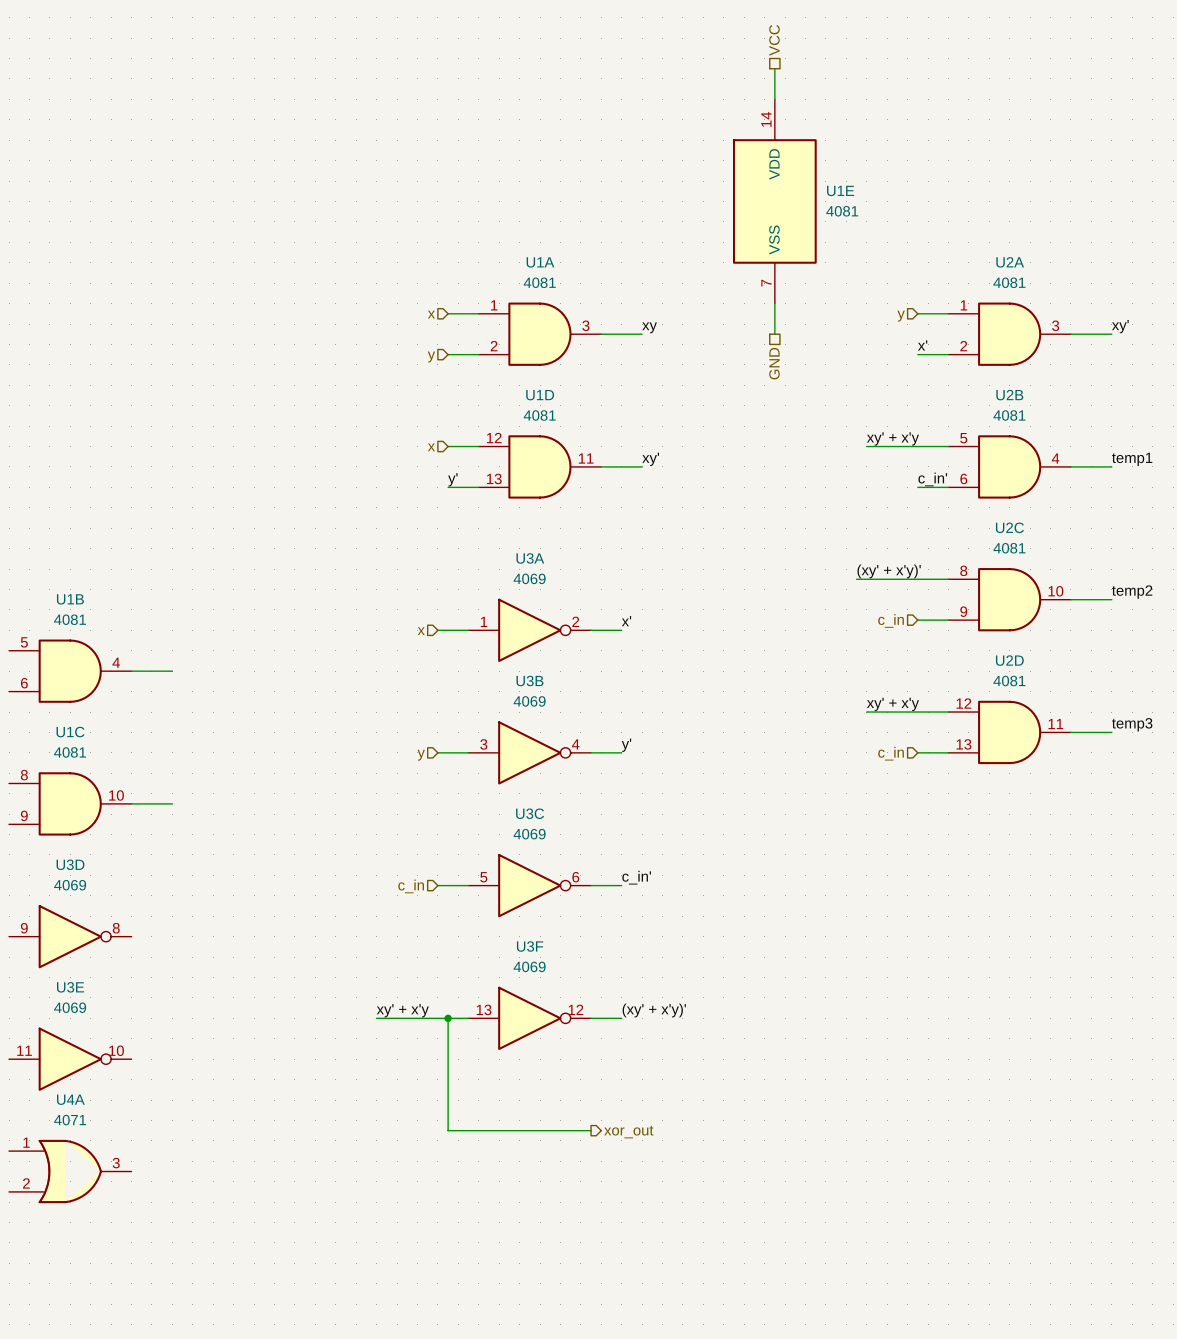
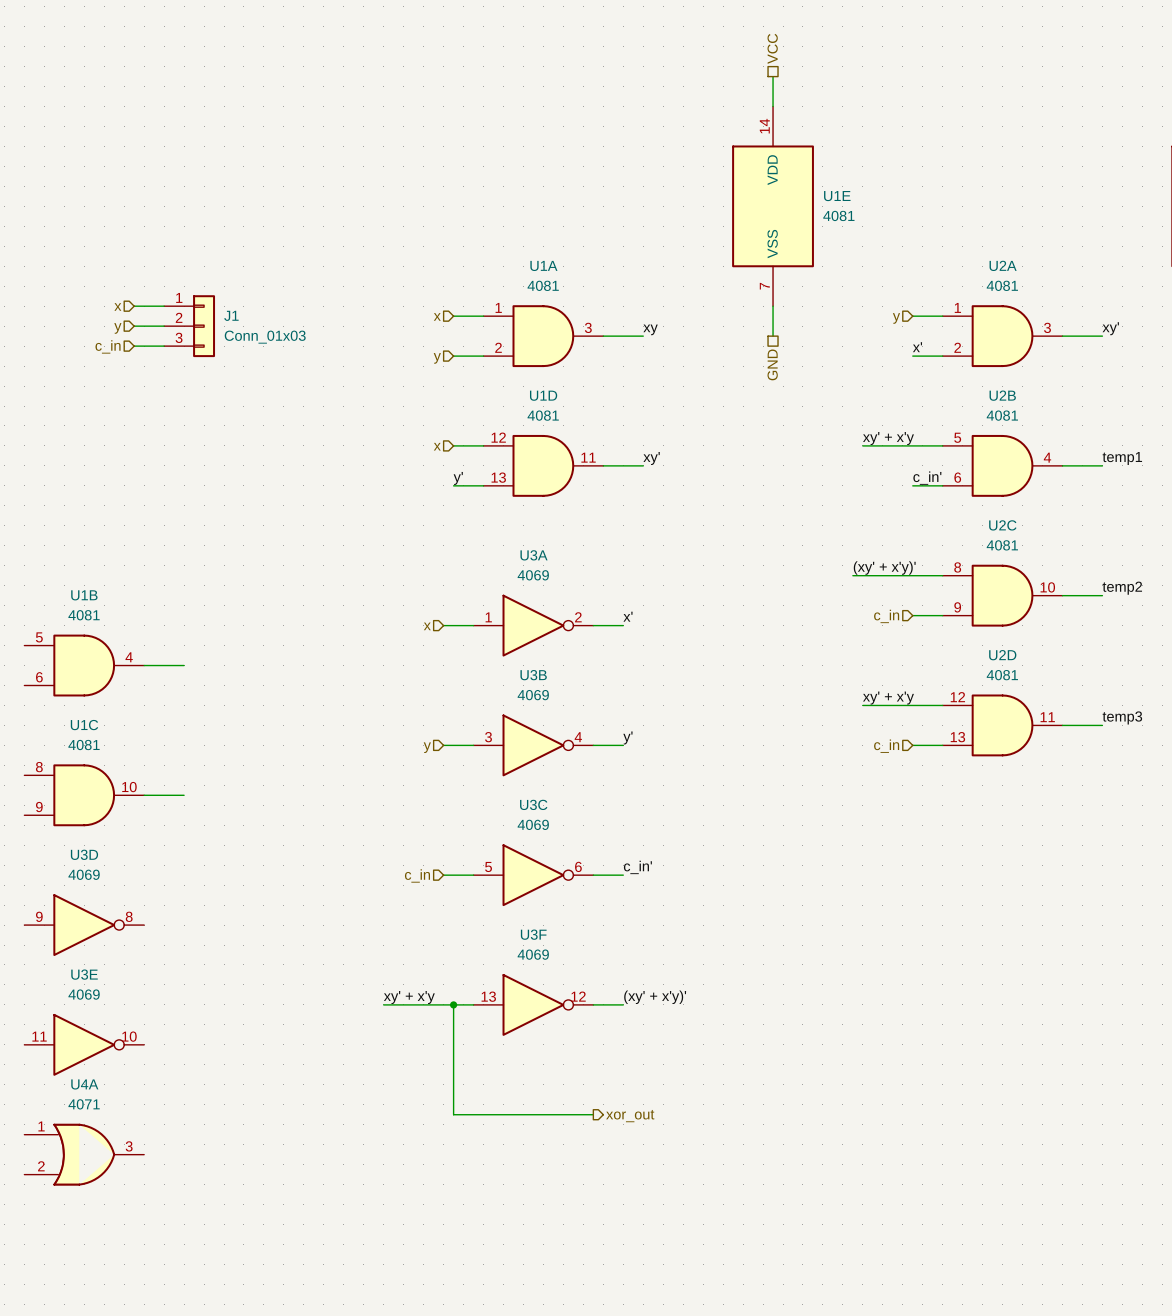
wire: none -> (134, 306) (164, 306)
hierarchical label: none -> x (117, 306)
wire: none -> (134, 326) (164, 326)
J1: none -> Conn_01x03 (189, 326)
hierarchical label: none -> y (117, 328)
wire: none -> (134, 346) (164, 346)
hierarchical label: none -> c_in (108, 346)

